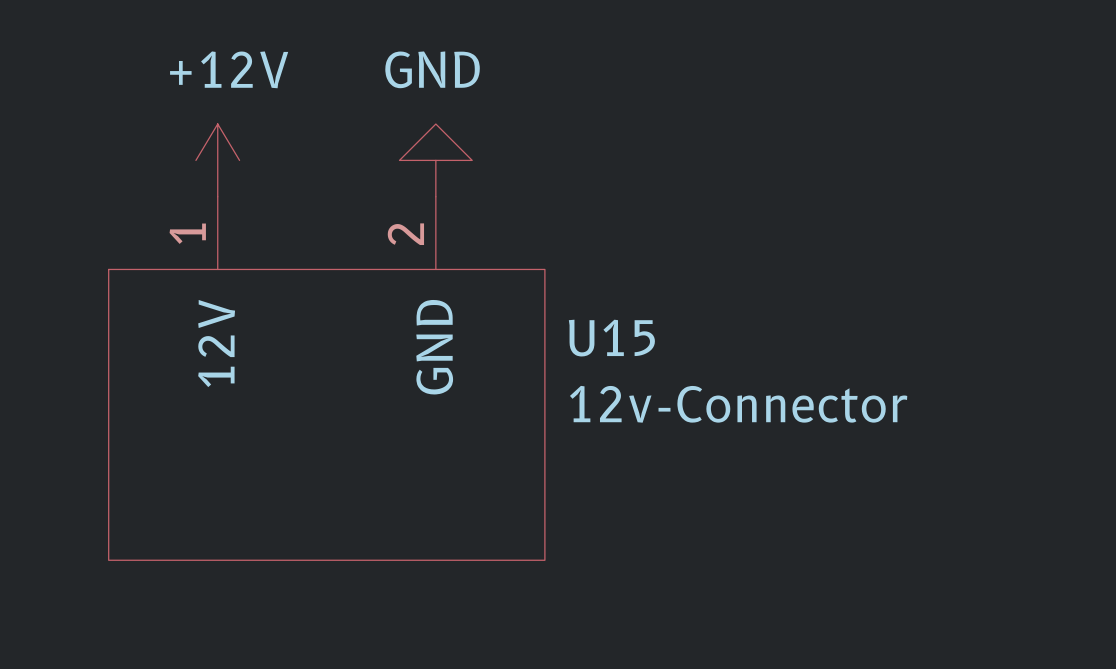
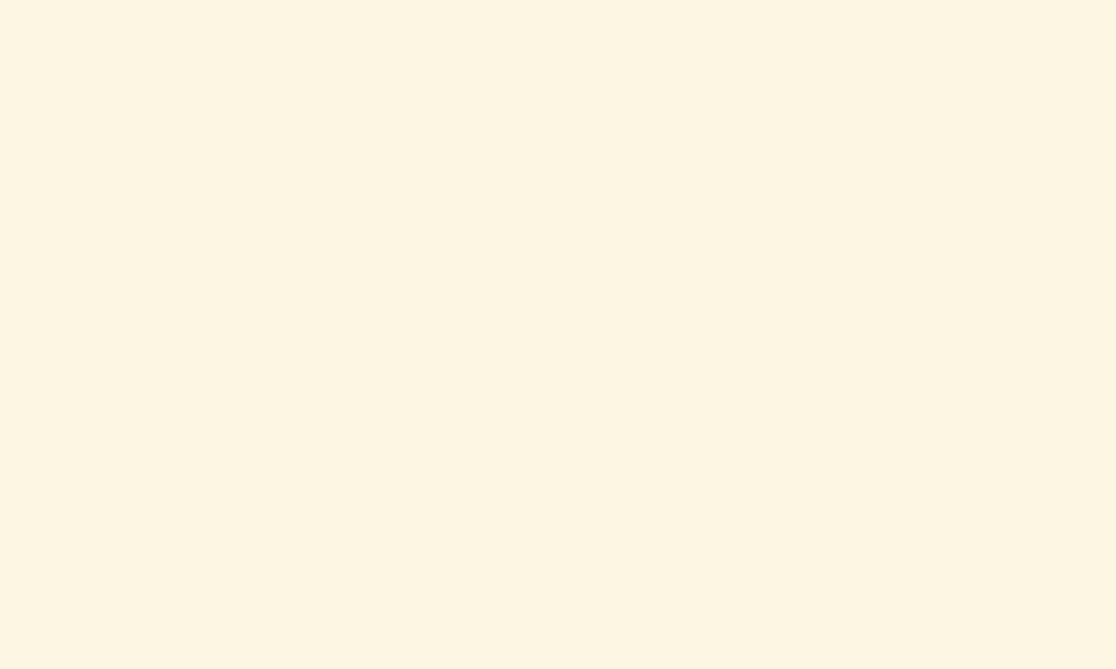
power symbol: +12V (217, 160) -> none
power symbol: GND (435, 160) -> none
U15: 12v-Connector (326, 378) -> none

